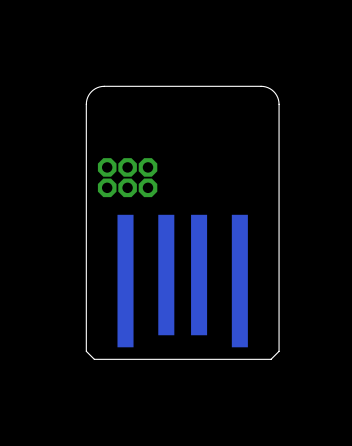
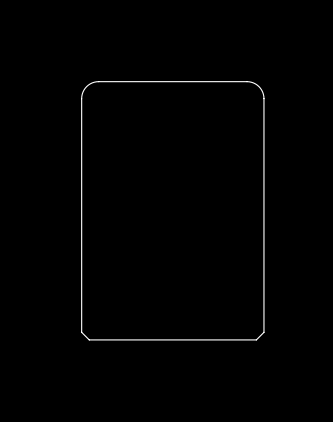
part: (127, 177) -> none
drawing: [117, 214, 134, 348] -> none
drawing: [158, 214, 208, 336] -> none
drawing: [231, 214, 248, 348] -> none

